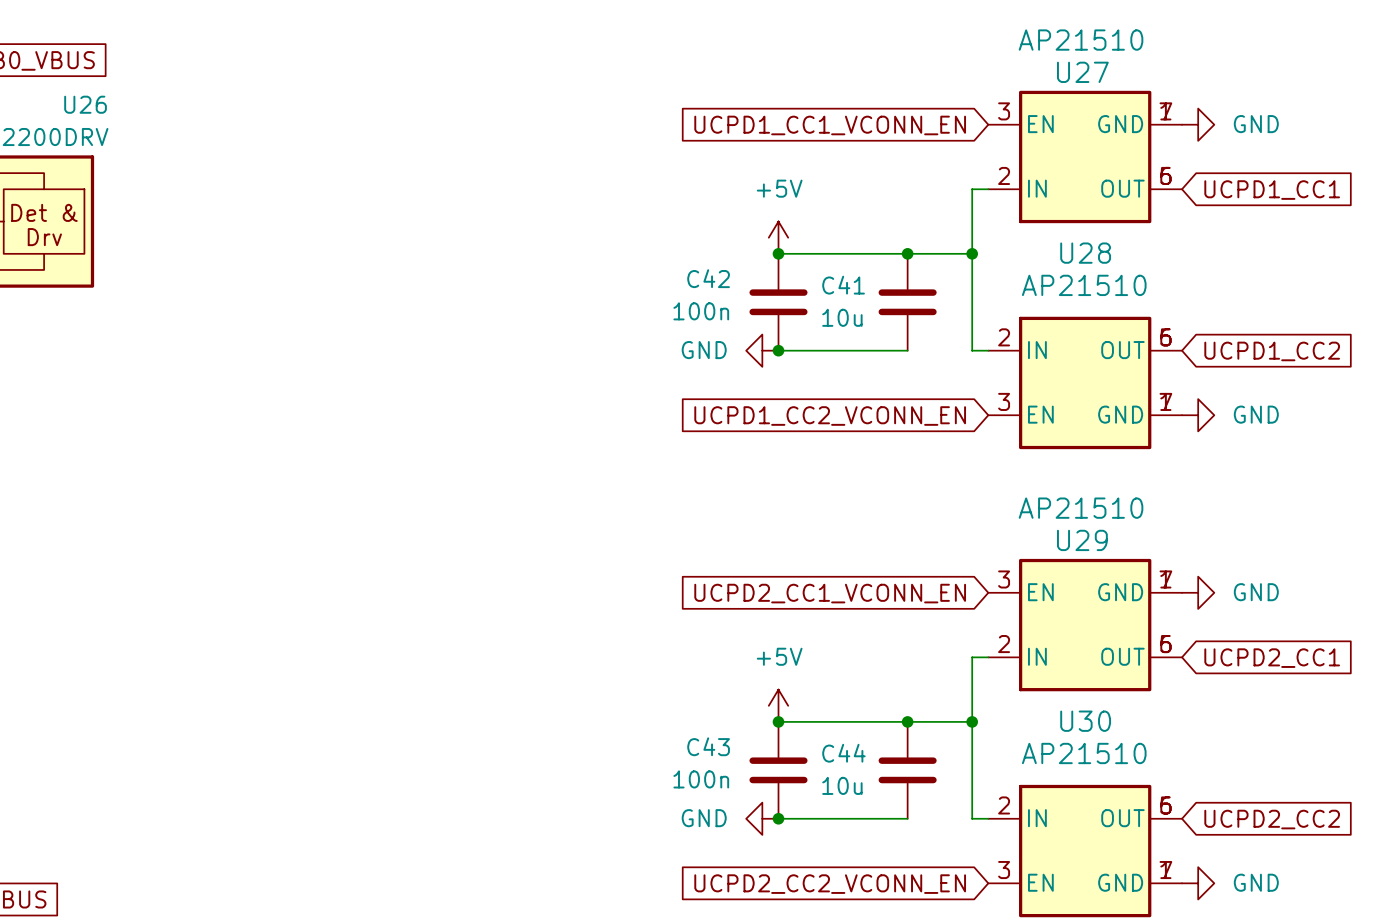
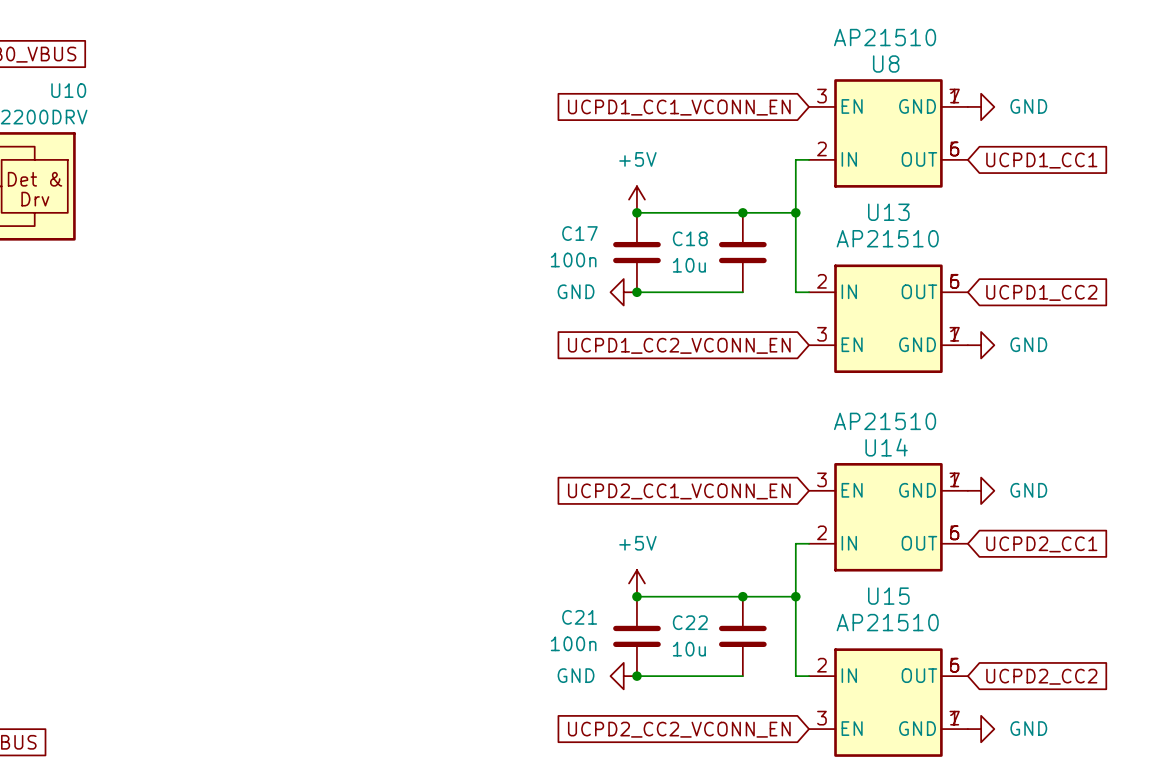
U27 name: U27 (1082, 72) -> U8 (886, 64)
U26 name: U26 (85, 104) -> U10 (68, 90)
U28 name: U28 (1085, 253) -> U13 (888, 212)
C42 name: C42 (708, 278) -> C17 (579, 233)
C41 name: C41 (843, 285) -> C18 (690, 238)
U29 name: U29 (1082, 540) -> U14 (886, 447)
U30 name: U30 (1085, 721) -> U15 (888, 596)
C43 name: C43 (708, 746) -> C21 (579, 617)
C44 name: C44 (843, 753) -> C22 (690, 622)

